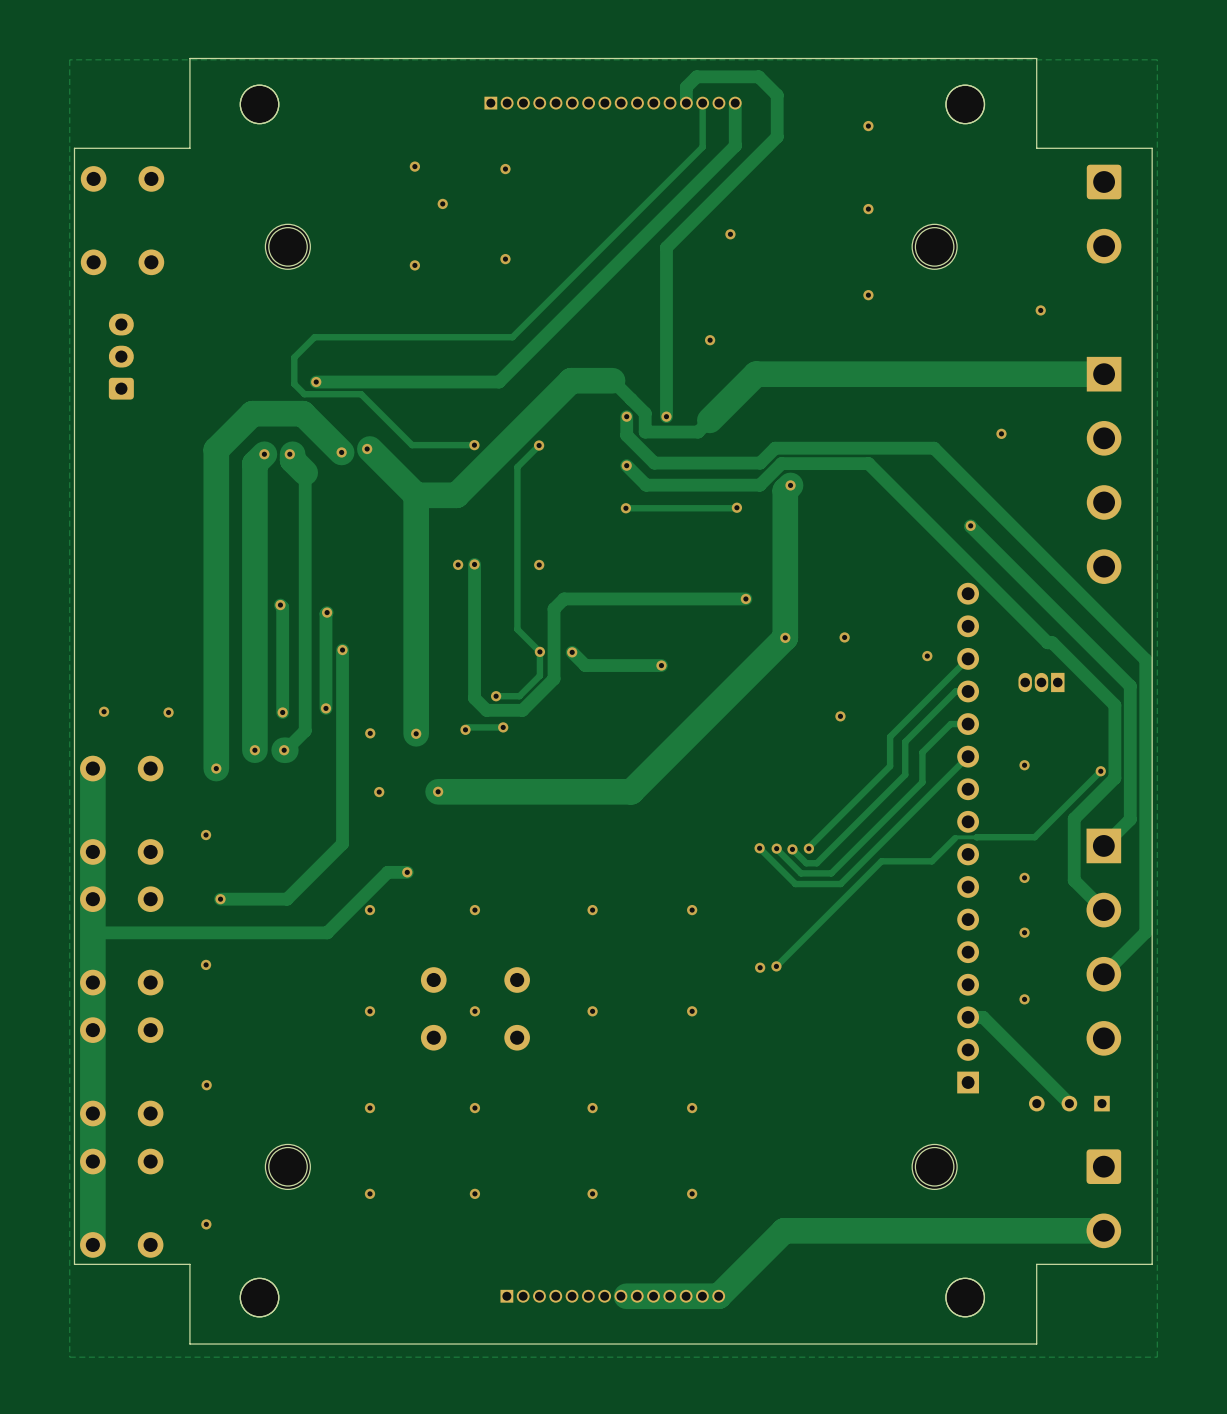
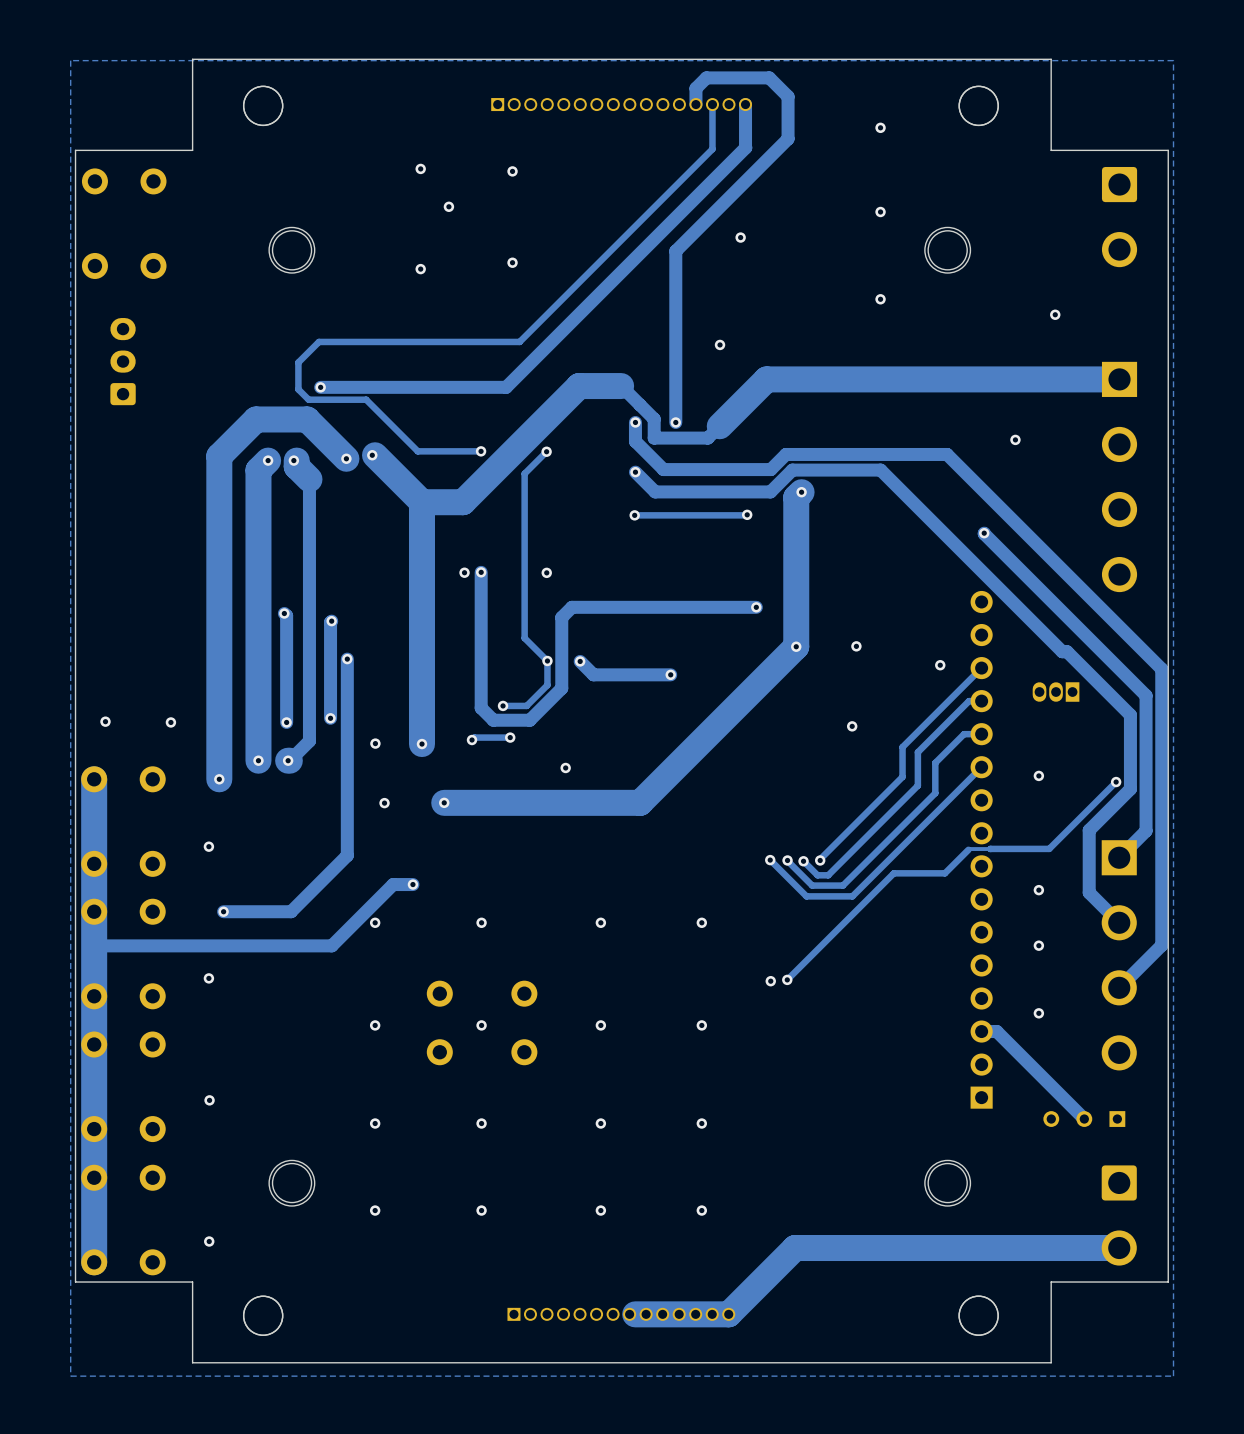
via: none -> (565, 767)

